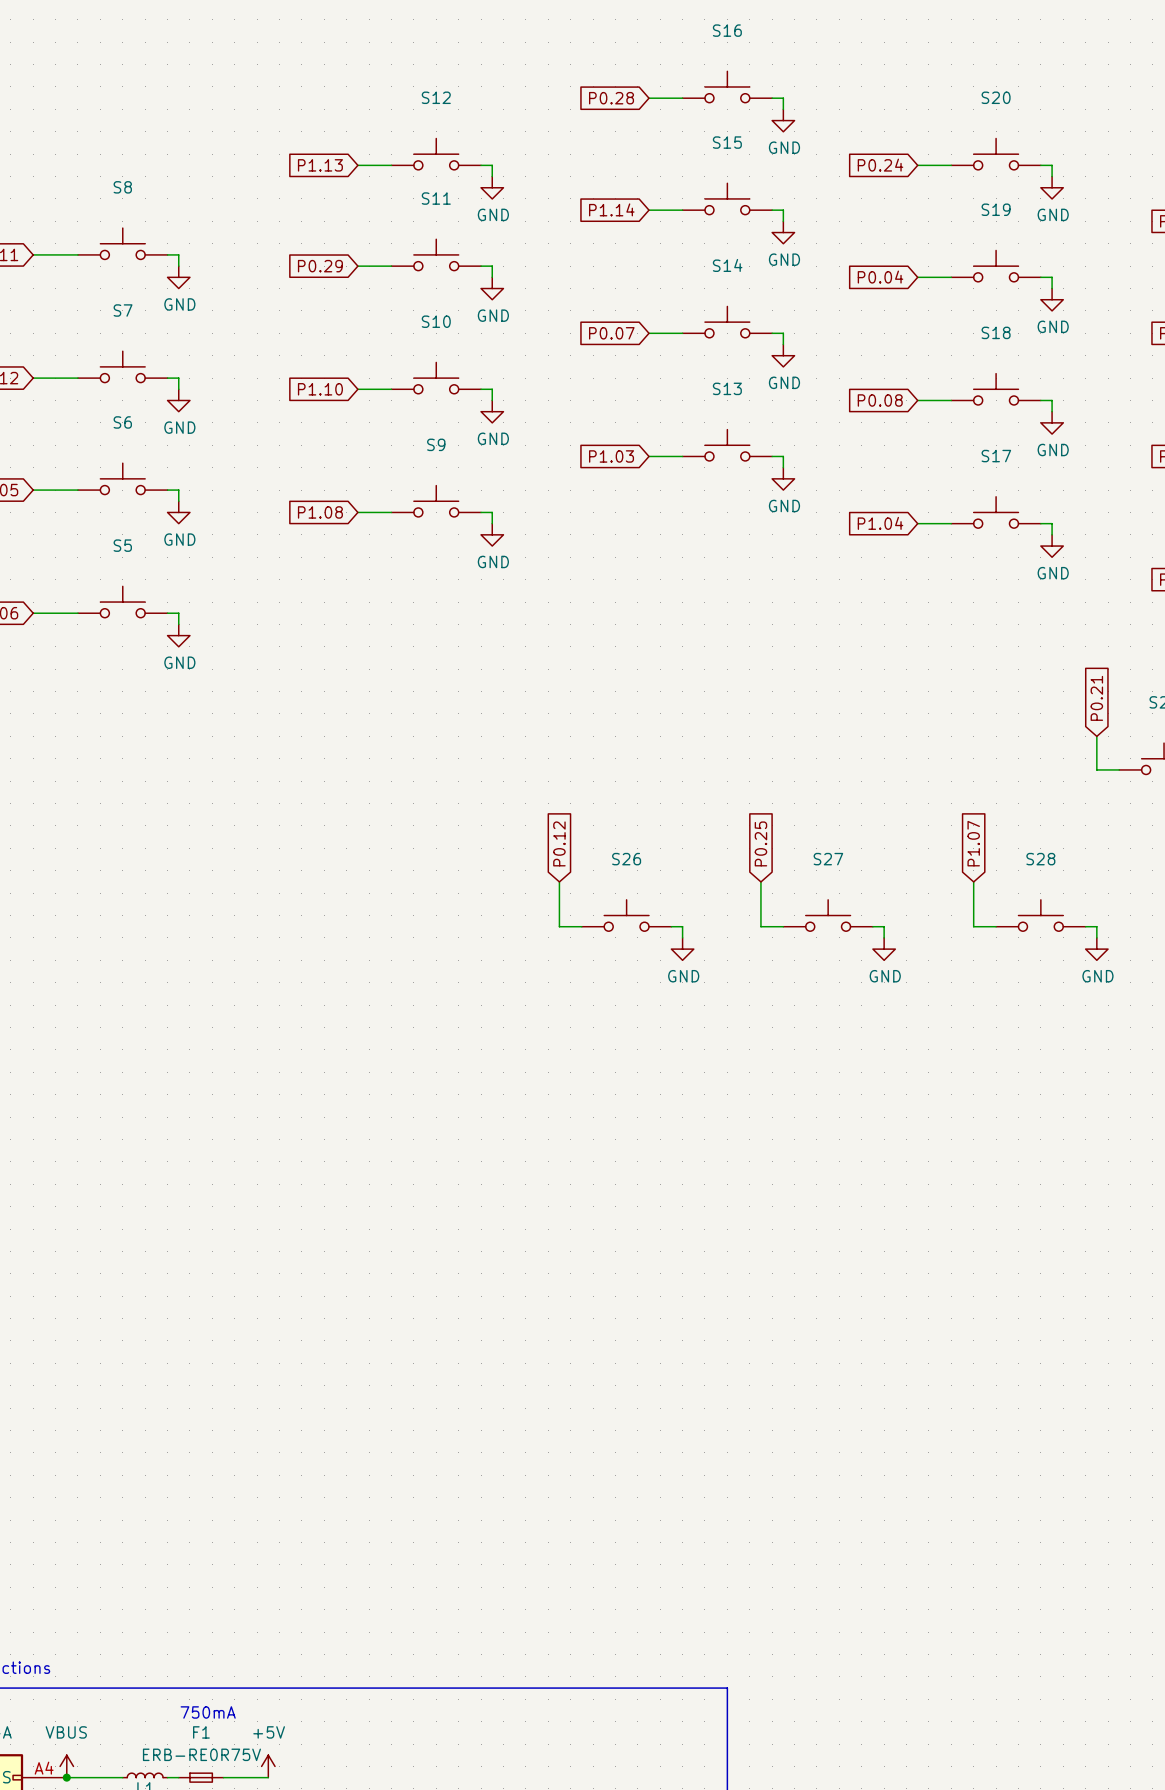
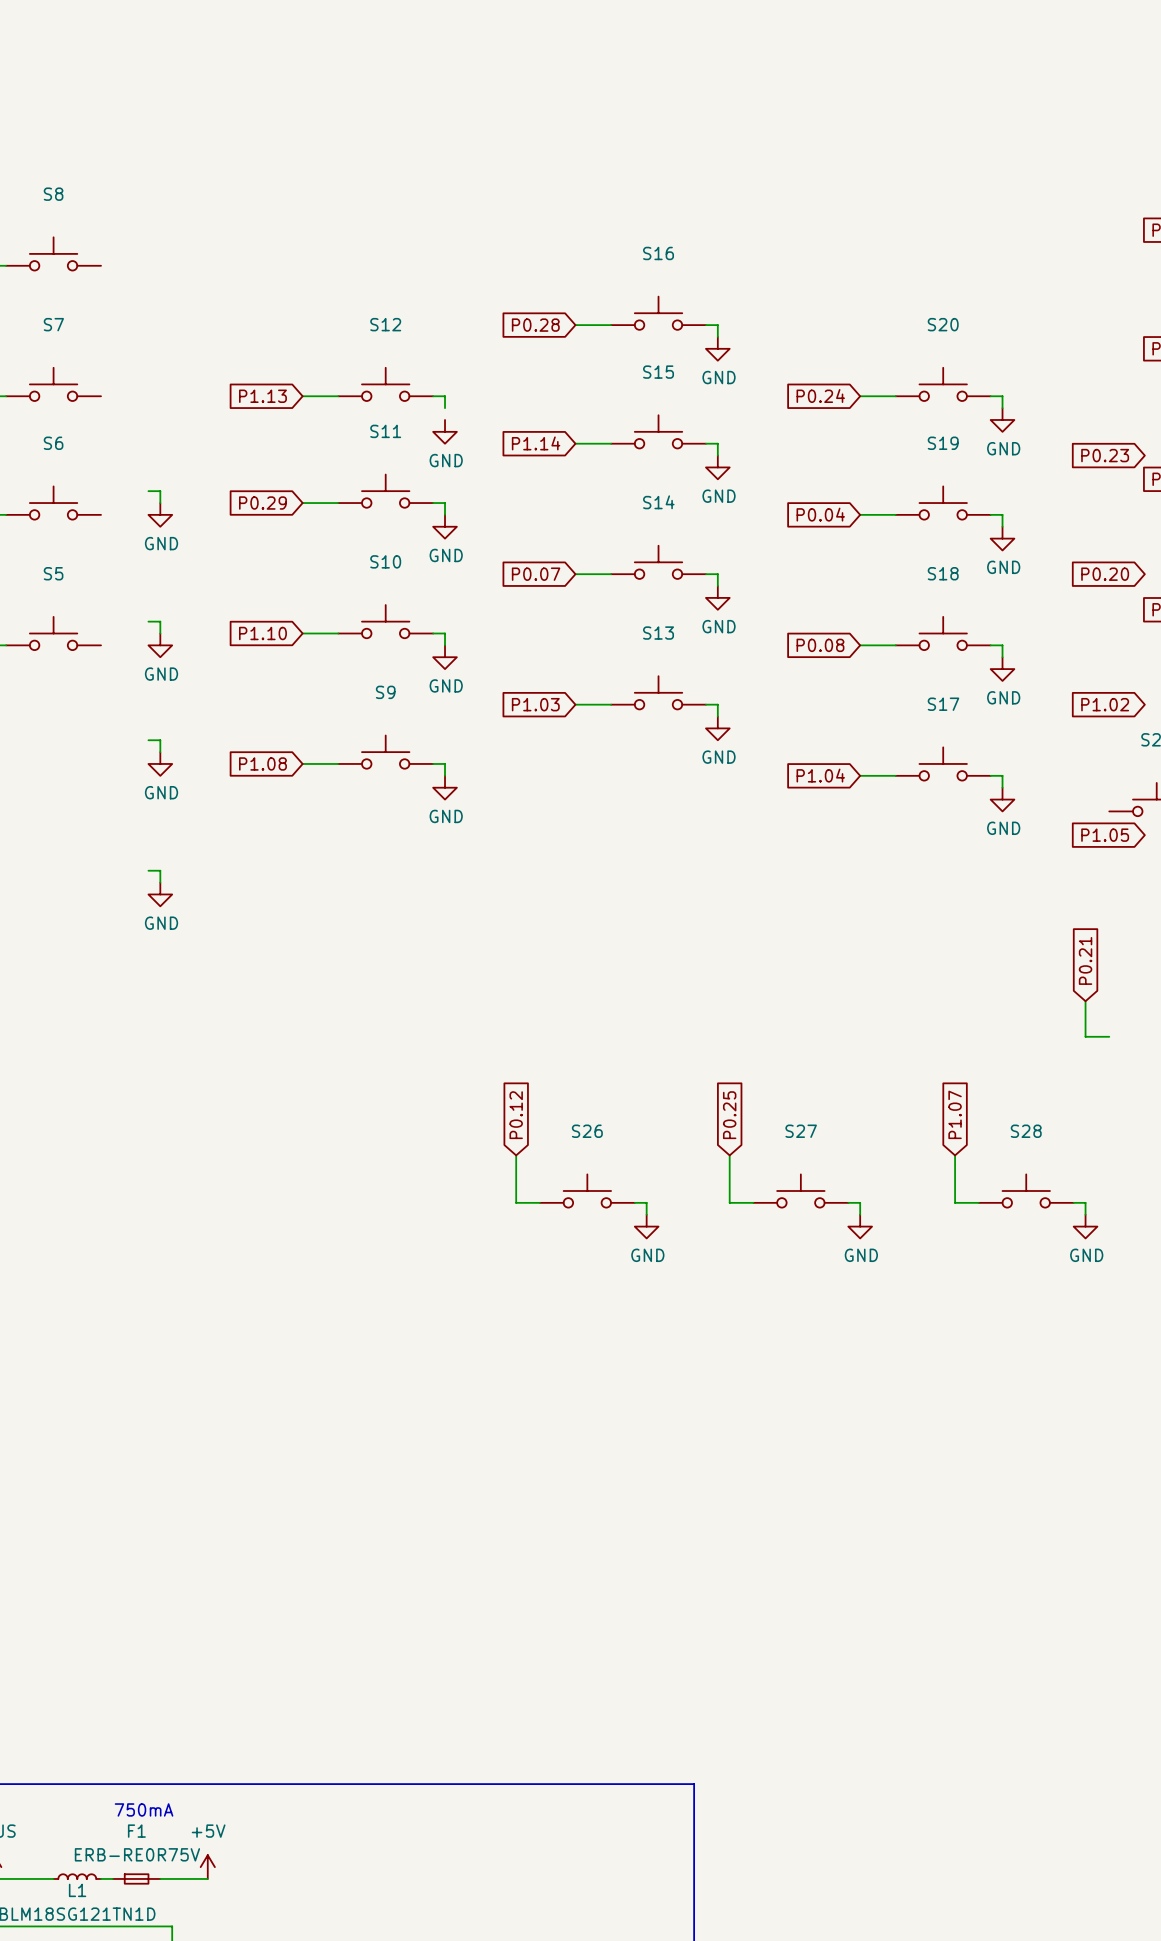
S16 position: (727, 86) -> (658, 313)
global label position: P0.28 (611, 98) -> P0.28 (535, 325)
wire: (648, 98) (682, 98) -> (575, 325) (611, 325)
wire: (772, 98) (783, 98) (783, 109) -> (705, 325) (717, 325) (717, 336)
power symbol: GND (783, 120) -> none
S12 position: (436, 154) -> (385, 384)
S20 position: (996, 154) -> (943, 384)
global label position: P1.13 (320, 165) -> P1.13 (262, 396)
wire: (357, 165) (391, 165) -> (302, 396) (338, 396)
wire: (481, 165) (492, 165) (492, 176) -> (433, 396) (445, 396) (445, 408)
global label position: P0.24 (880, 165) -> P0.24 (820, 395)
wire: (917, 165) (951, 165) -> (860, 396) (895, 396)
wire: (1040, 165) (1052, 165) (1052, 176) -> (990, 396) (1002, 396) (1002, 408)
power symbol: GND (492, 187) -> none
power symbol: GND (1052, 187) -> none
S15 position: (727, 198) -> (658, 431)
global label position: P1.14 (611, 209) -> P1.14 (536, 443)
wire: (648, 210) (682, 210) -> (575, 443) (611, 443)
wire: (772, 210) (783, 210) (783, 221) -> (705, 443) (717, 443) (717, 455)
power symbol: GND (783, 232) -> none
wire: (167, 254) (178, 254) (178, 266) -> (148, 491) (160, 491) (160, 503)
S11 position: (436, 254) -> (385, 491)
global label position: P0.29 (320, 266) -> P0.29 (262, 503)
wire: (357, 266) (391, 266) -> (302, 503) (338, 503)
wire: (481, 266) (492, 266) (492, 277) -> (433, 503) (445, 503) (445, 514)
S19 position: (996, 266) -> (943, 503)
power symbol: GND (178, 277) -> none
global label position: P0.04 (880, 277) -> P0.04 (820, 514)
wire: (917, 277) (951, 277) -> (860, 514) (895, 514)
wire: (1040, 277) (1052, 277) (1052, 288) -> (990, 514) (1002, 514) (1002, 526)
power symbol: GND (492, 288) -> none
power symbol: GND (1052, 299) -> none
S14 position: (727, 322) -> (658, 562)
global label position: P0.07 (611, 333) -> P0.07 (536, 574)
wire: (648, 333) (682, 333) -> (575, 574) (611, 574)
wire: (772, 333) (783, 333) (783, 344) -> (705, 574) (717, 574) (717, 586)
power symbol position: GND (783, 355) -> GND (717, 348)
wire: (167, 378) (178, 378) (178, 389) -> (148, 621) (160, 621) (160, 633)
S10 position: (436, 378) -> (385, 621)
global label position: P1.10 (320, 389) -> P1.10 (262, 633)
wire: (357, 389) (391, 389) -> (302, 633) (338, 633)
wire: (481, 389) (492, 389) (492, 400) -> (433, 633) (445, 633) (445, 645)
S18 position: (996, 389) -> (943, 633)
power symbol: GND (178, 400) -> none
global label position: P0.08 (880, 400) -> P0.08 (820, 645)
wire: (917, 400) (951, 400) -> (860, 645) (895, 645)
wire: (1040, 400) (1052, 400) (1052, 411) -> (990, 645) (1002, 645) (1002, 657)
power symbol position: GND (1052, 422) -> GND (1002, 419)
global label: none -> P0.23 (1105, 455)
S13 position: (727, 445) -> (658, 692)
global label position: P1.03 (611, 456) -> P1.03 (535, 704)
wire: (648, 456) (682, 456) -> (575, 704) (611, 704)
wire: (772, 456) (783, 456) (783, 467) -> (705, 704) (717, 704) (717, 716)
power symbol position: GND (783, 478) -> GND (717, 467)
wire: (167, 490) (178, 490) (178, 501) -> (148, 740) (160, 740) (160, 752)
power symbol: none -> GND (160, 514)
S9 position: (436, 501) -> (385, 752)
power symbol: GND (178, 512) -> none
global label position: P1.08 (320, 512) -> P1.08 (262, 763)
wire: (357, 512) (391, 512) -> (302, 763) (338, 763)
wire: (481, 512) (492, 512) (492, 523) -> (433, 763) (445, 763) (445, 775)
S17 position: (996, 512) -> (943, 763)
global label position: P1.04 (880, 523) -> P1.04 (820, 775)
wire: (917, 523) (951, 523) -> (860, 775) (895, 775)
wire: (1040, 523) (1052, 523) (1052, 534) -> (990, 775) (1002, 775) (1002, 787)
power symbol position: GND (492, 534) -> GND (445, 526)
power symbol position: GND (1052, 546) -> GND (1002, 538)
global label: none -> P0.20 (1105, 574)
power symbol: none -> GND (717, 597)
wire: (167, 613) (178, 613) (178, 624) -> (148, 870) (160, 870) (160, 882)
power symbol: none -> GND (160, 645)
power symbol: none -> GND (445, 657)
power symbol: GND (178, 635) -> none
power symbol: none -> GND (1002, 669)
global label: none -> P1.02 (1105, 704)
power symbol: none -> GND (717, 728)
global label position: P0.21 (1096, 698) -> P0.21 (1085, 960)
power symbol: none -> GND (160, 763)
wire: (1096, 736) (1096, 769) (1119, 769) -> (1085, 1001) (1085, 1036) (1109, 1036)
power symbol: none -> GND (445, 787)
power symbol: none -> GND (1002, 799)
global label: none -> P1.05 (1105, 835)
global label position: P0.12 (559, 843) -> P0.12 (516, 1115)
global label position: P0.25 (760, 843) -> P0.25 (729, 1115)
global label position: P1.07 (973, 843) -> P1.07 (955, 1114)
power symbol: none -> GND (160, 894)
wire: (559, 881) (559, 926) (581, 926) -> (516, 1155) (516, 1202) (539, 1202)
wire: (760, 881) (760, 926) (783, 926) -> (729, 1155) (729, 1202) (753, 1202)
wire: (973, 881) (973, 926) (996, 926) -> (955, 1155) (955, 1202) (978, 1202)
S26 position: (626, 915) -> (587, 1191)
S27 position: (828, 915) -> (800, 1191)
S28 position: (1040, 915) -> (1026, 1191)
wire: (671, 926) (682, 926) (682, 937) -> (634, 1202) (646, 1202) (646, 1214)
wire: (872, 926) (884, 926) (884, 937) -> (848, 1202) (860, 1202) (860, 1214)
wire: (1085, 926) (1096, 926) (1096, 937) -> (1073, 1202) (1085, 1202) (1085, 1214)
power symbol: GND (682, 949) -> none
power symbol: GND (884, 949) -> none
power symbol: GND (1096, 949) -> none
power symbol: none -> GND (646, 1226)
power symbol: none -> GND (860, 1226)
power symbol: none -> GND (1085, 1226)

